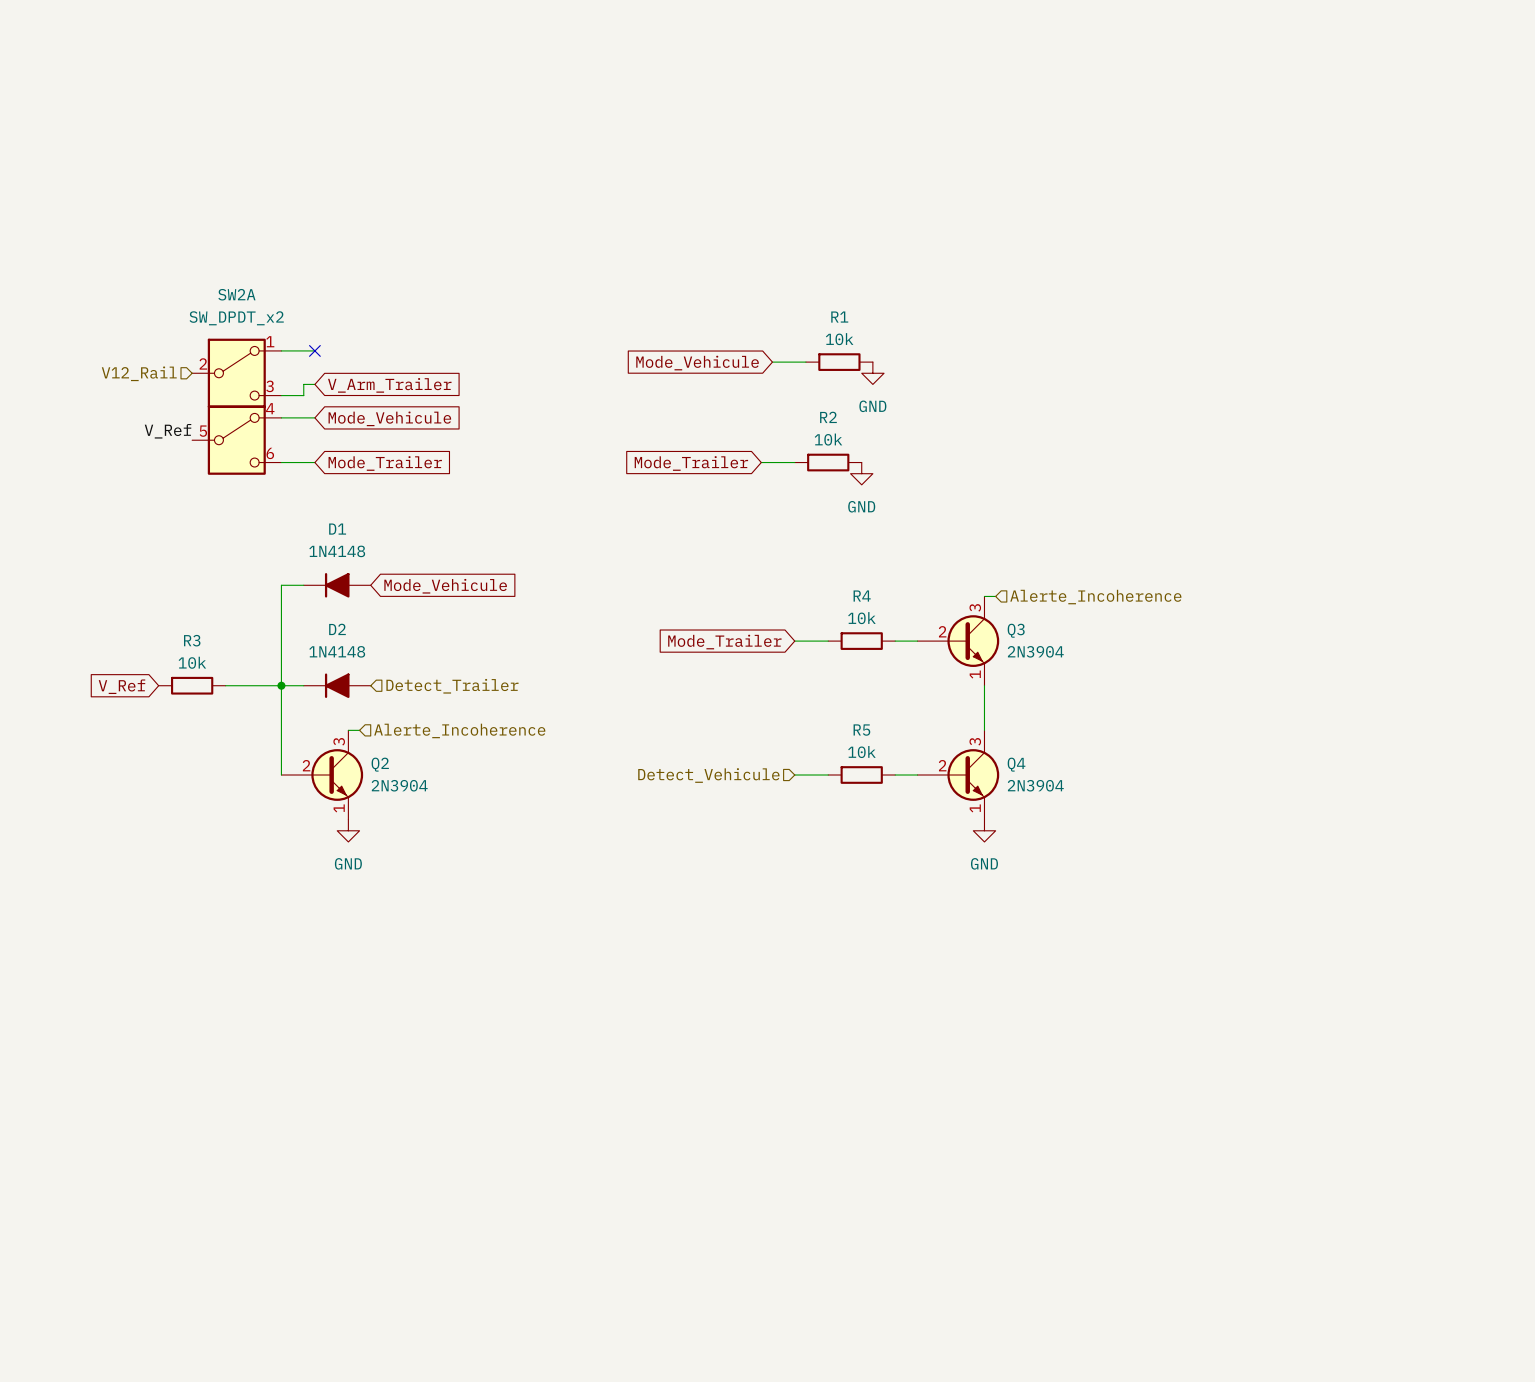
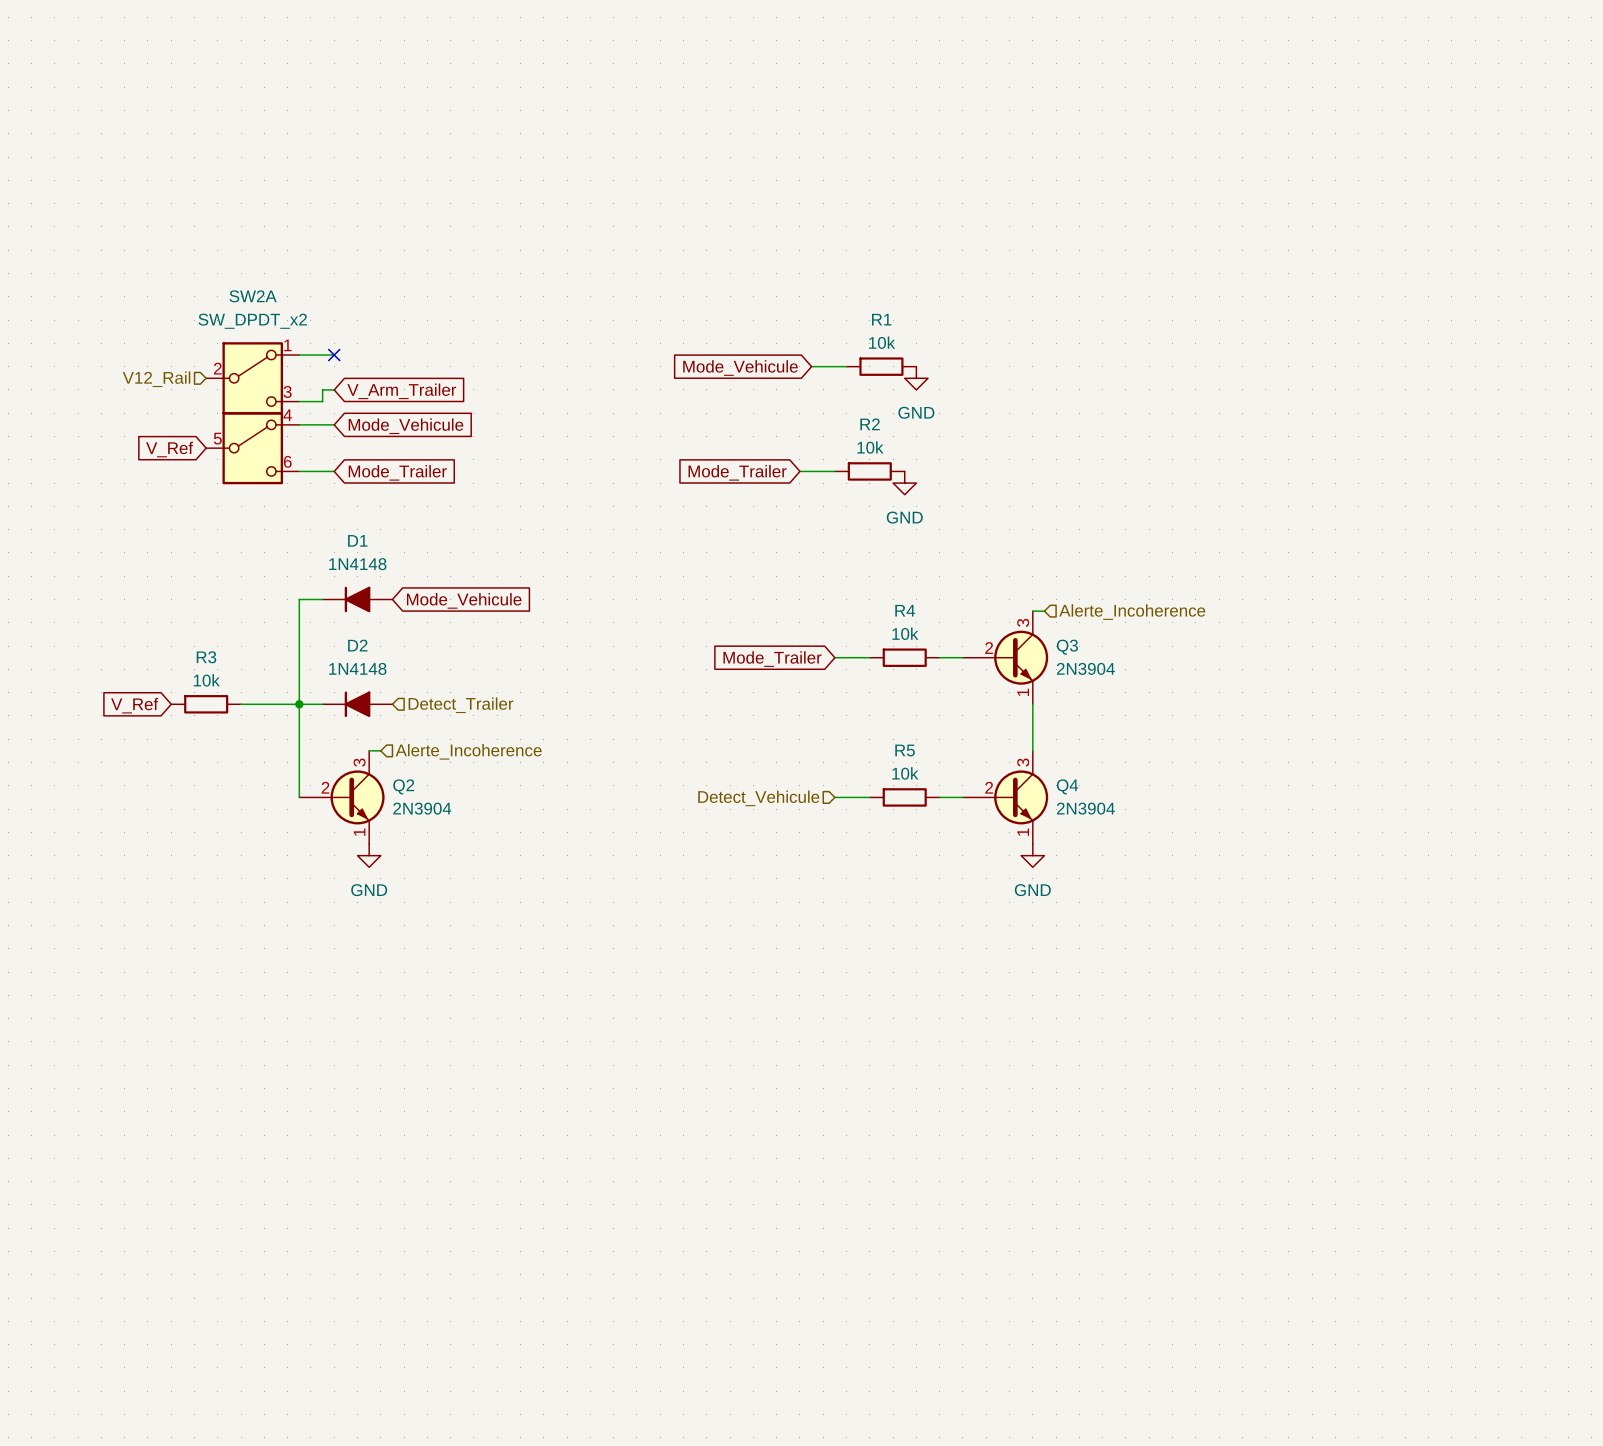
label: V_Ref (168, 431) -> none
global label: none -> V_Ref (169, 449)

